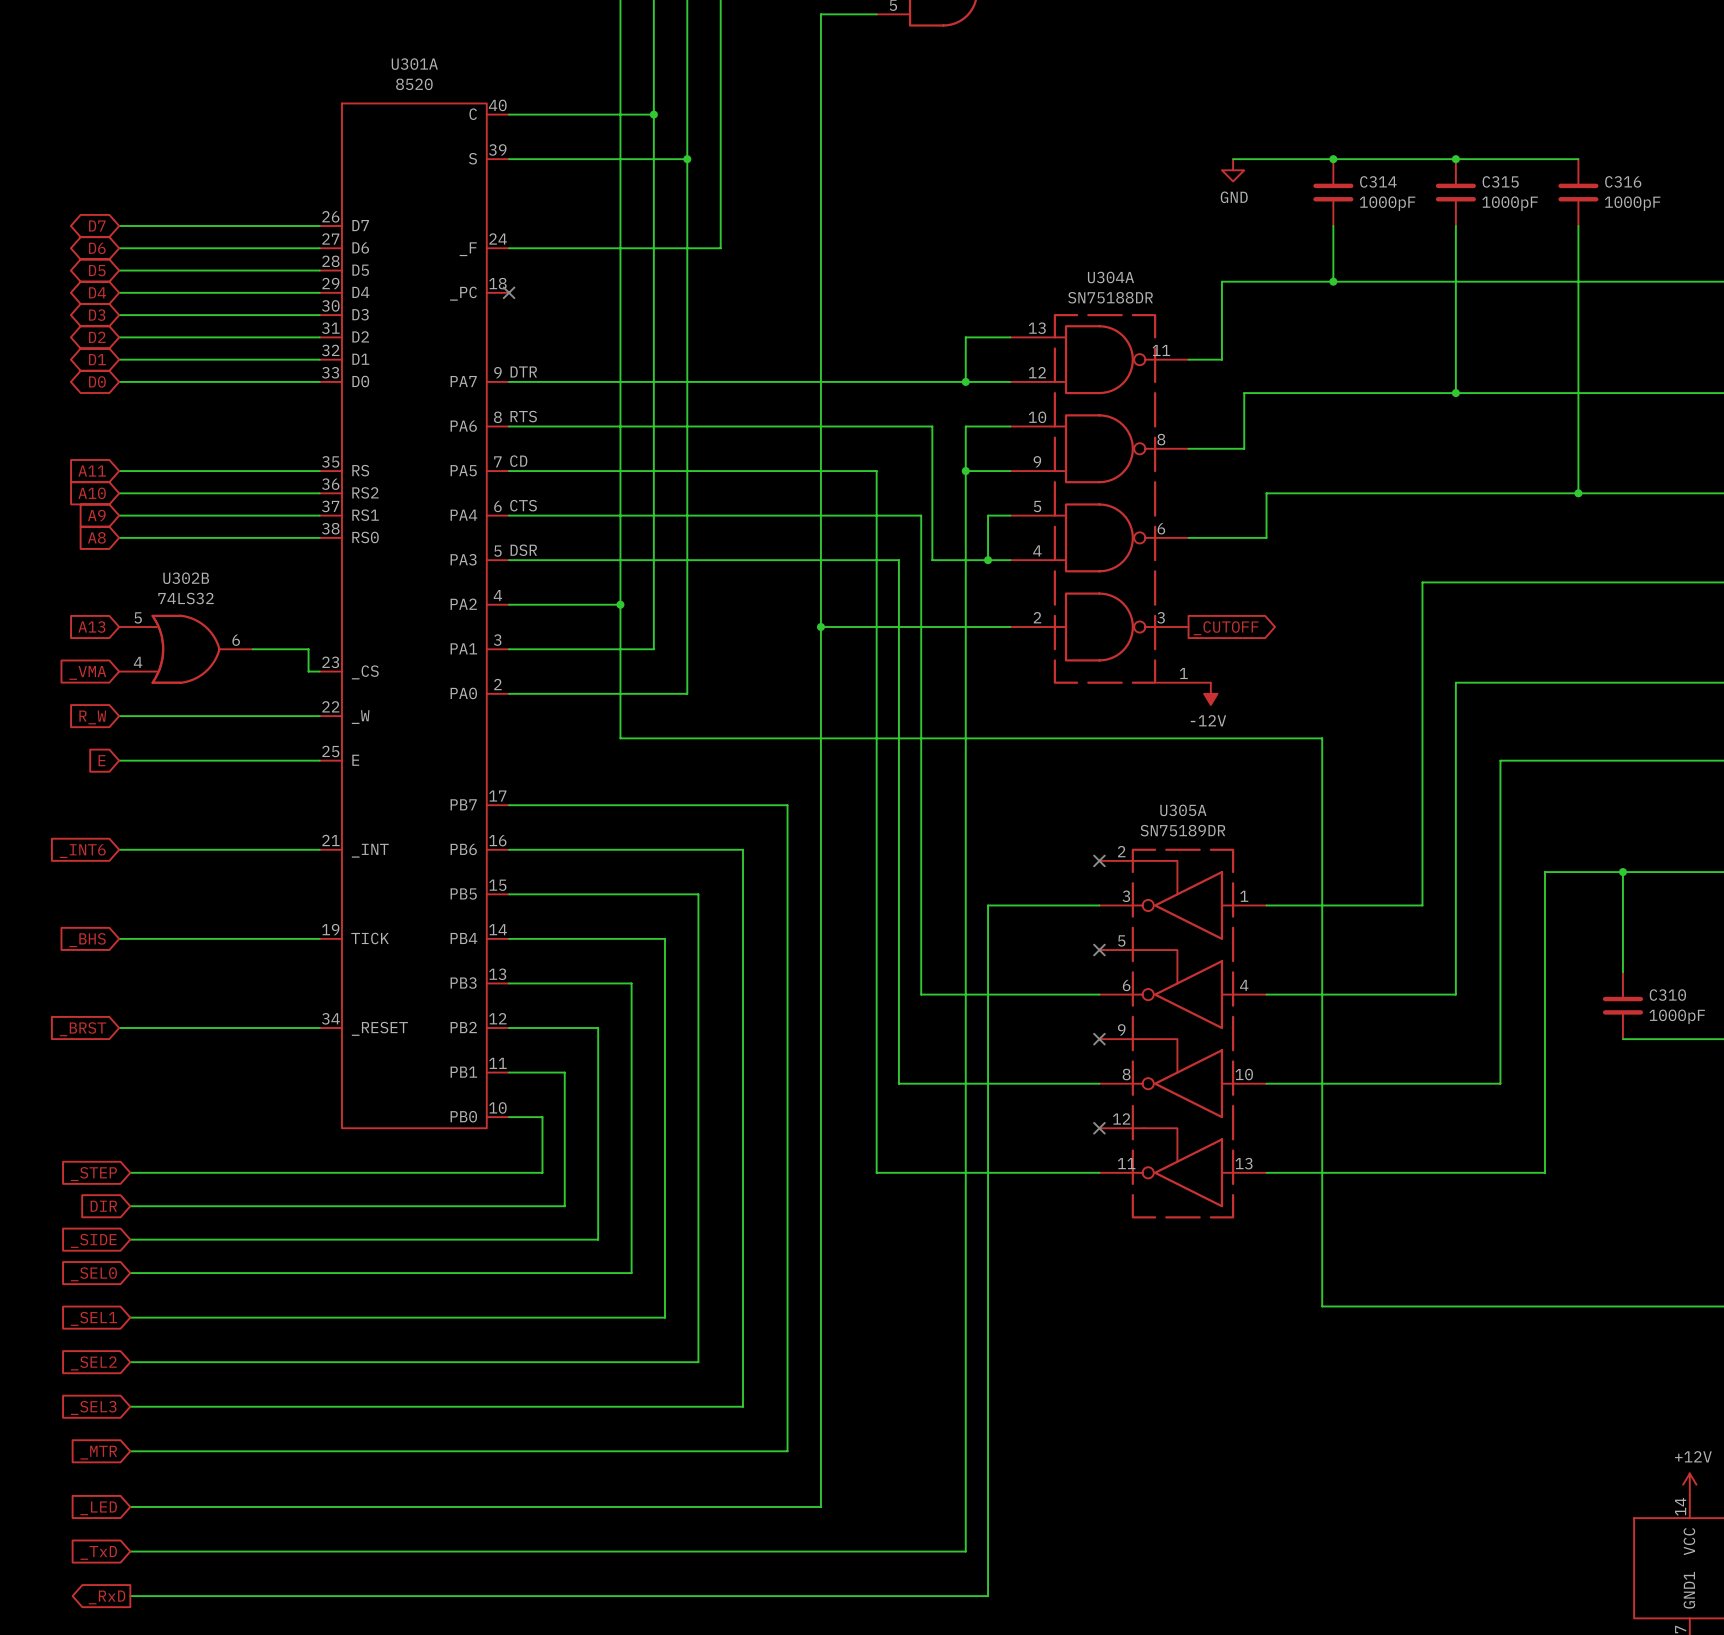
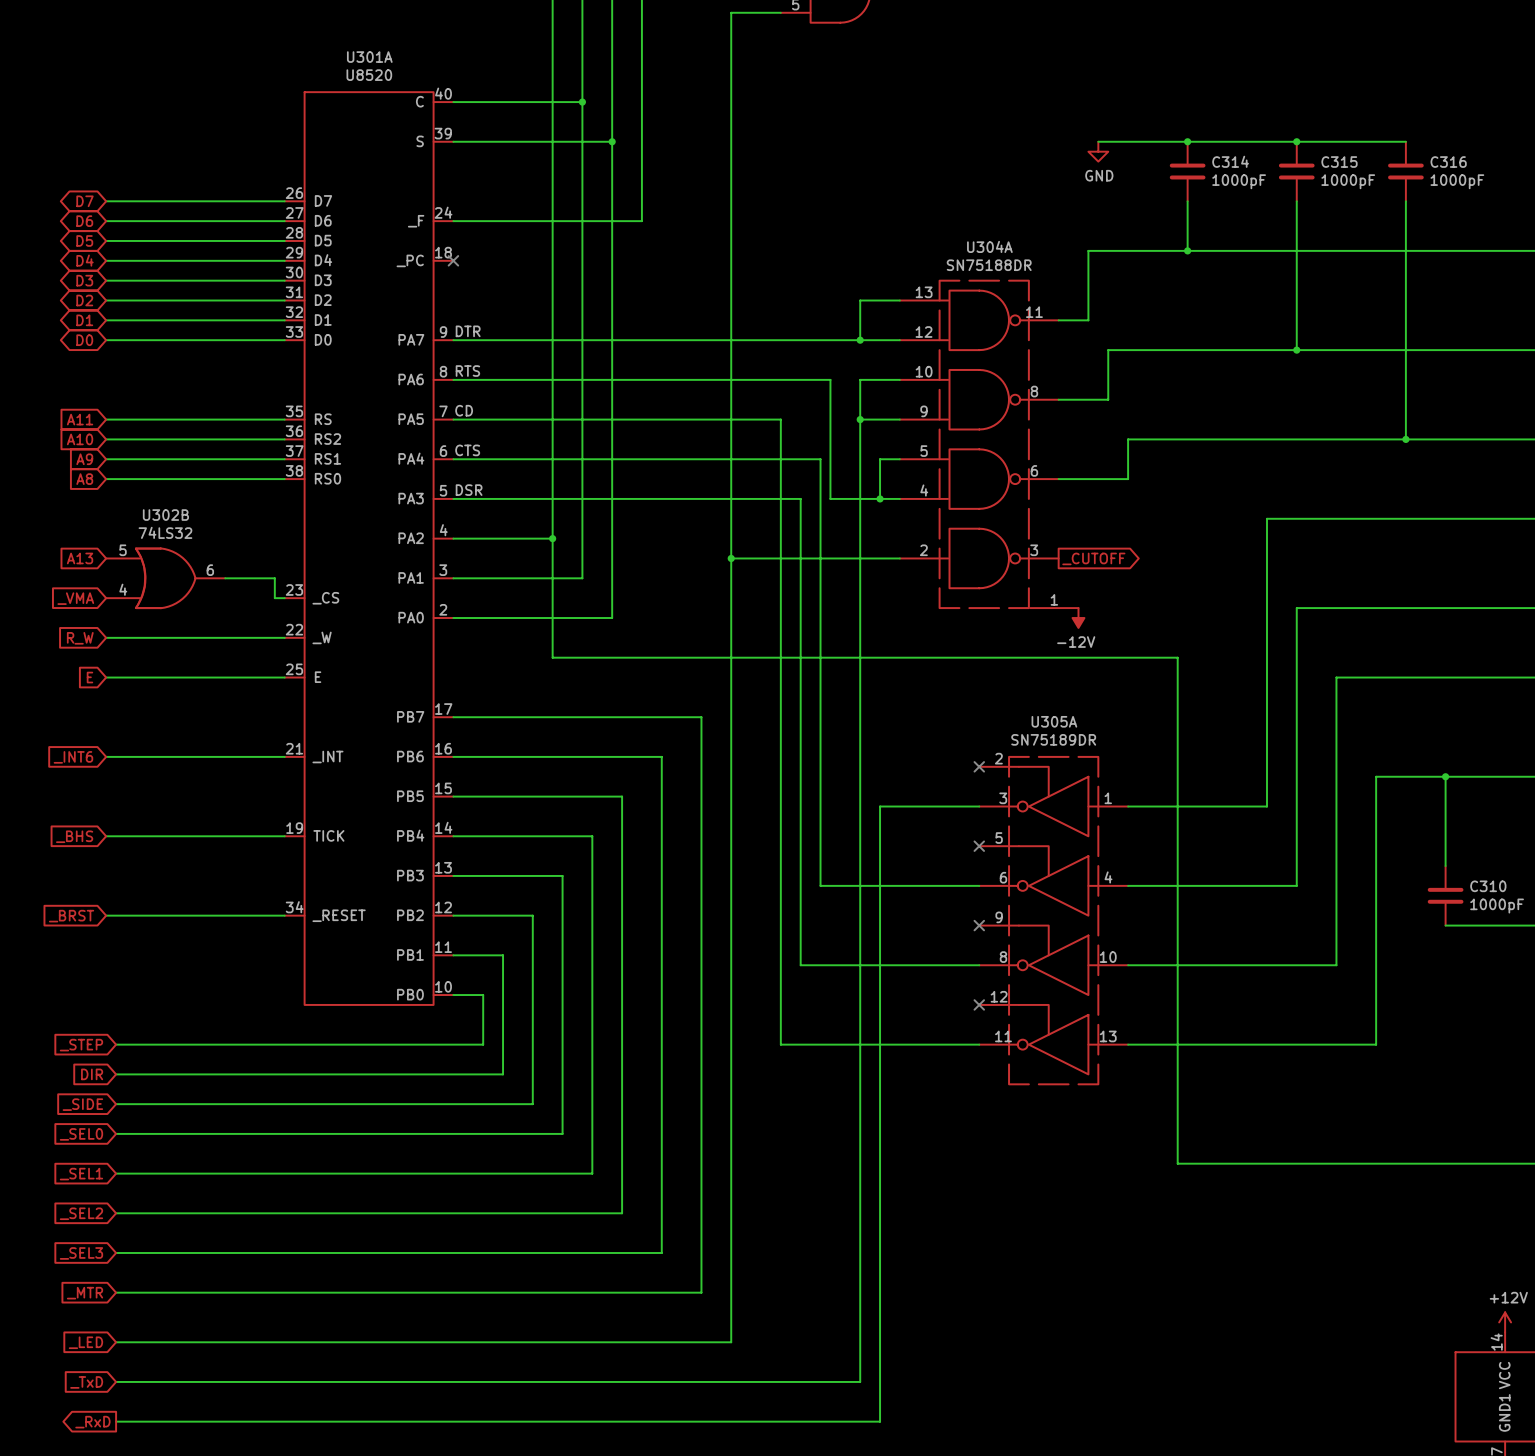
U301A value: 8520 (414, 84) -> U8520 (369, 75)

